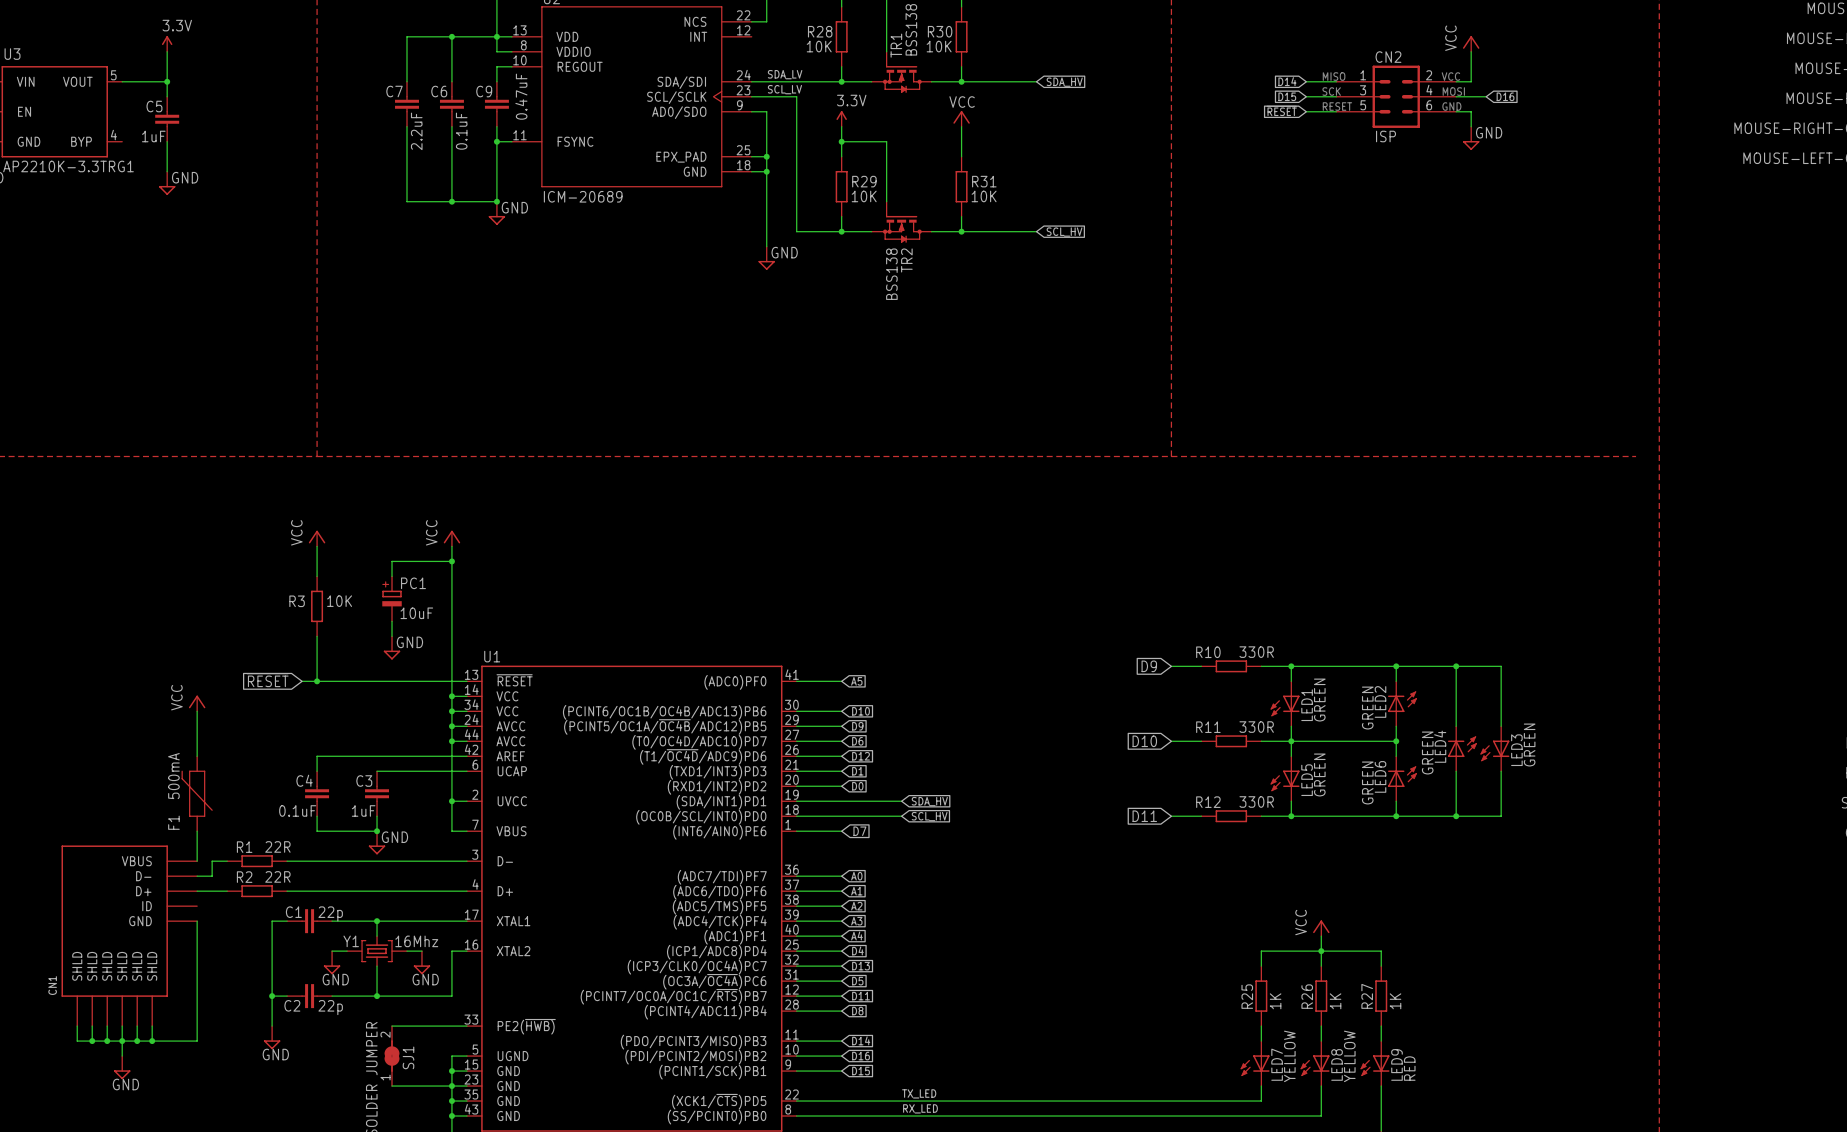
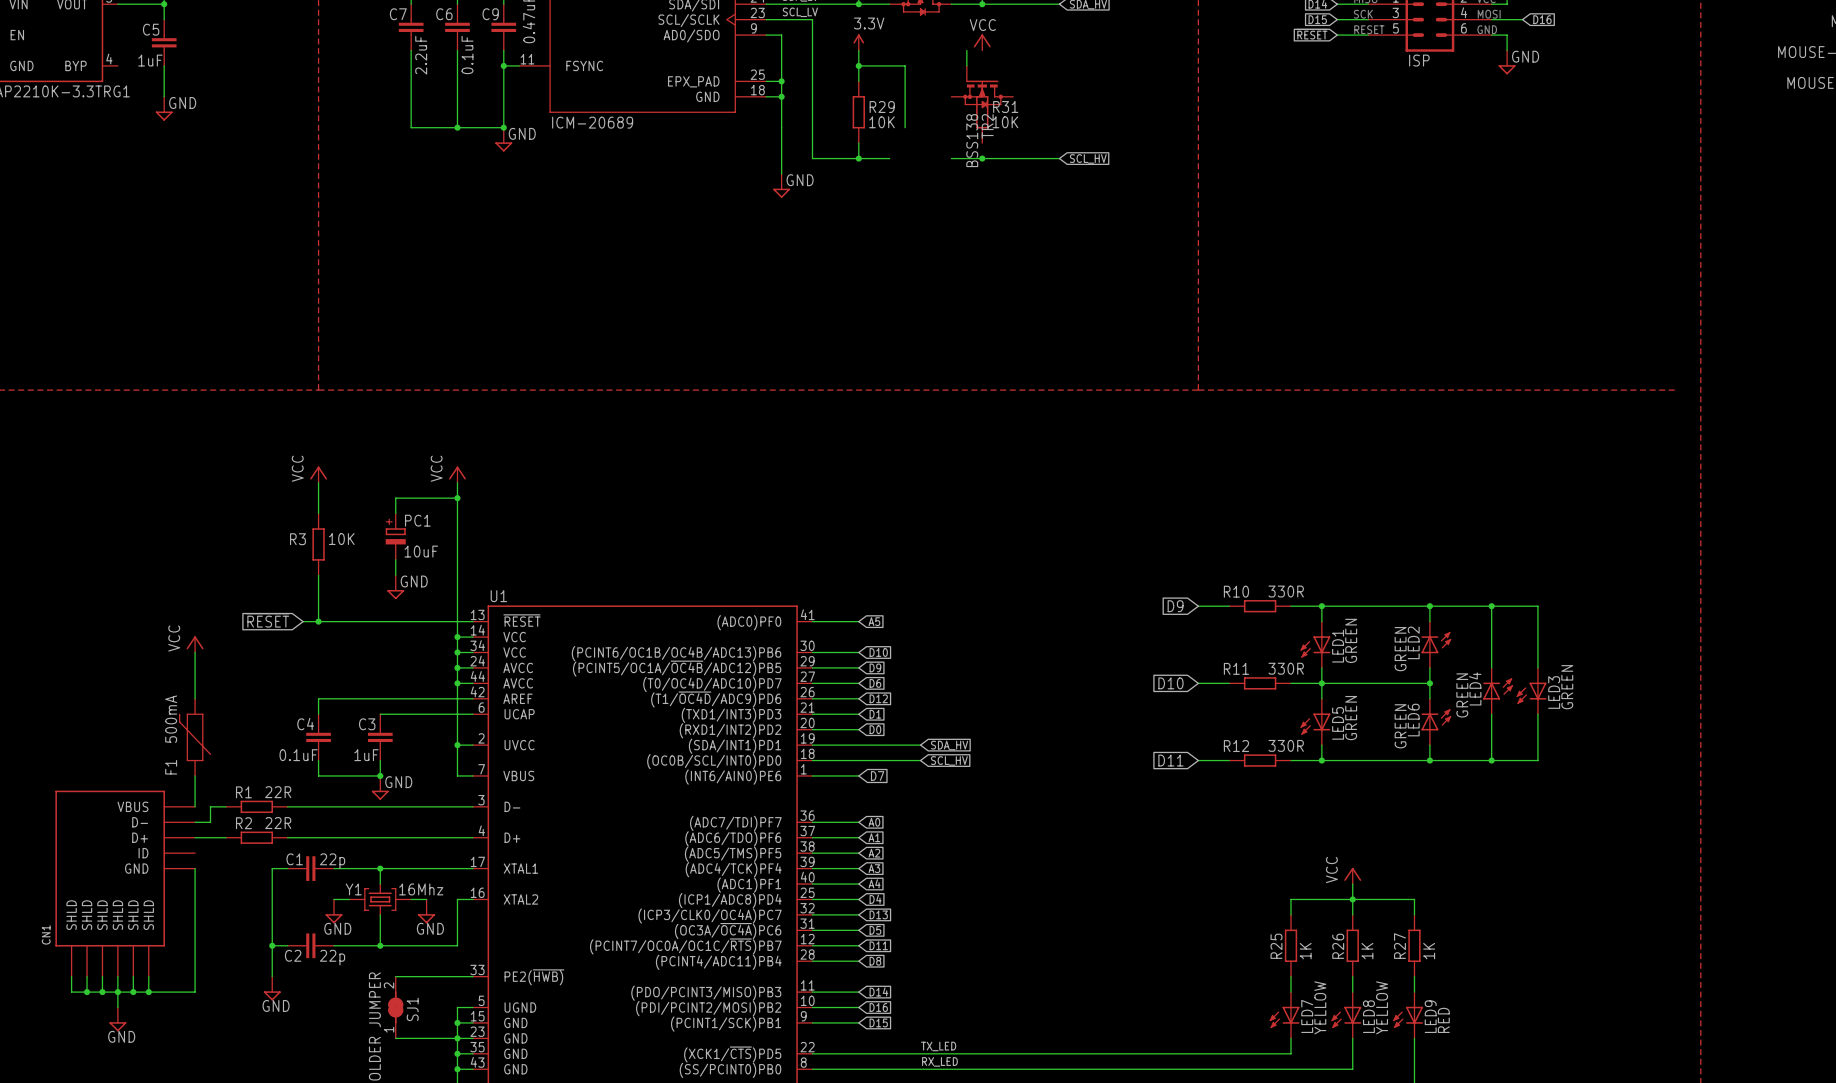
wire: (961, 126) (961, 156) -> none
wire: (961, 216) (961, 231) -> (966, 50) (966, 65)
TR2 position: (901, 222) -> (982, 87)

